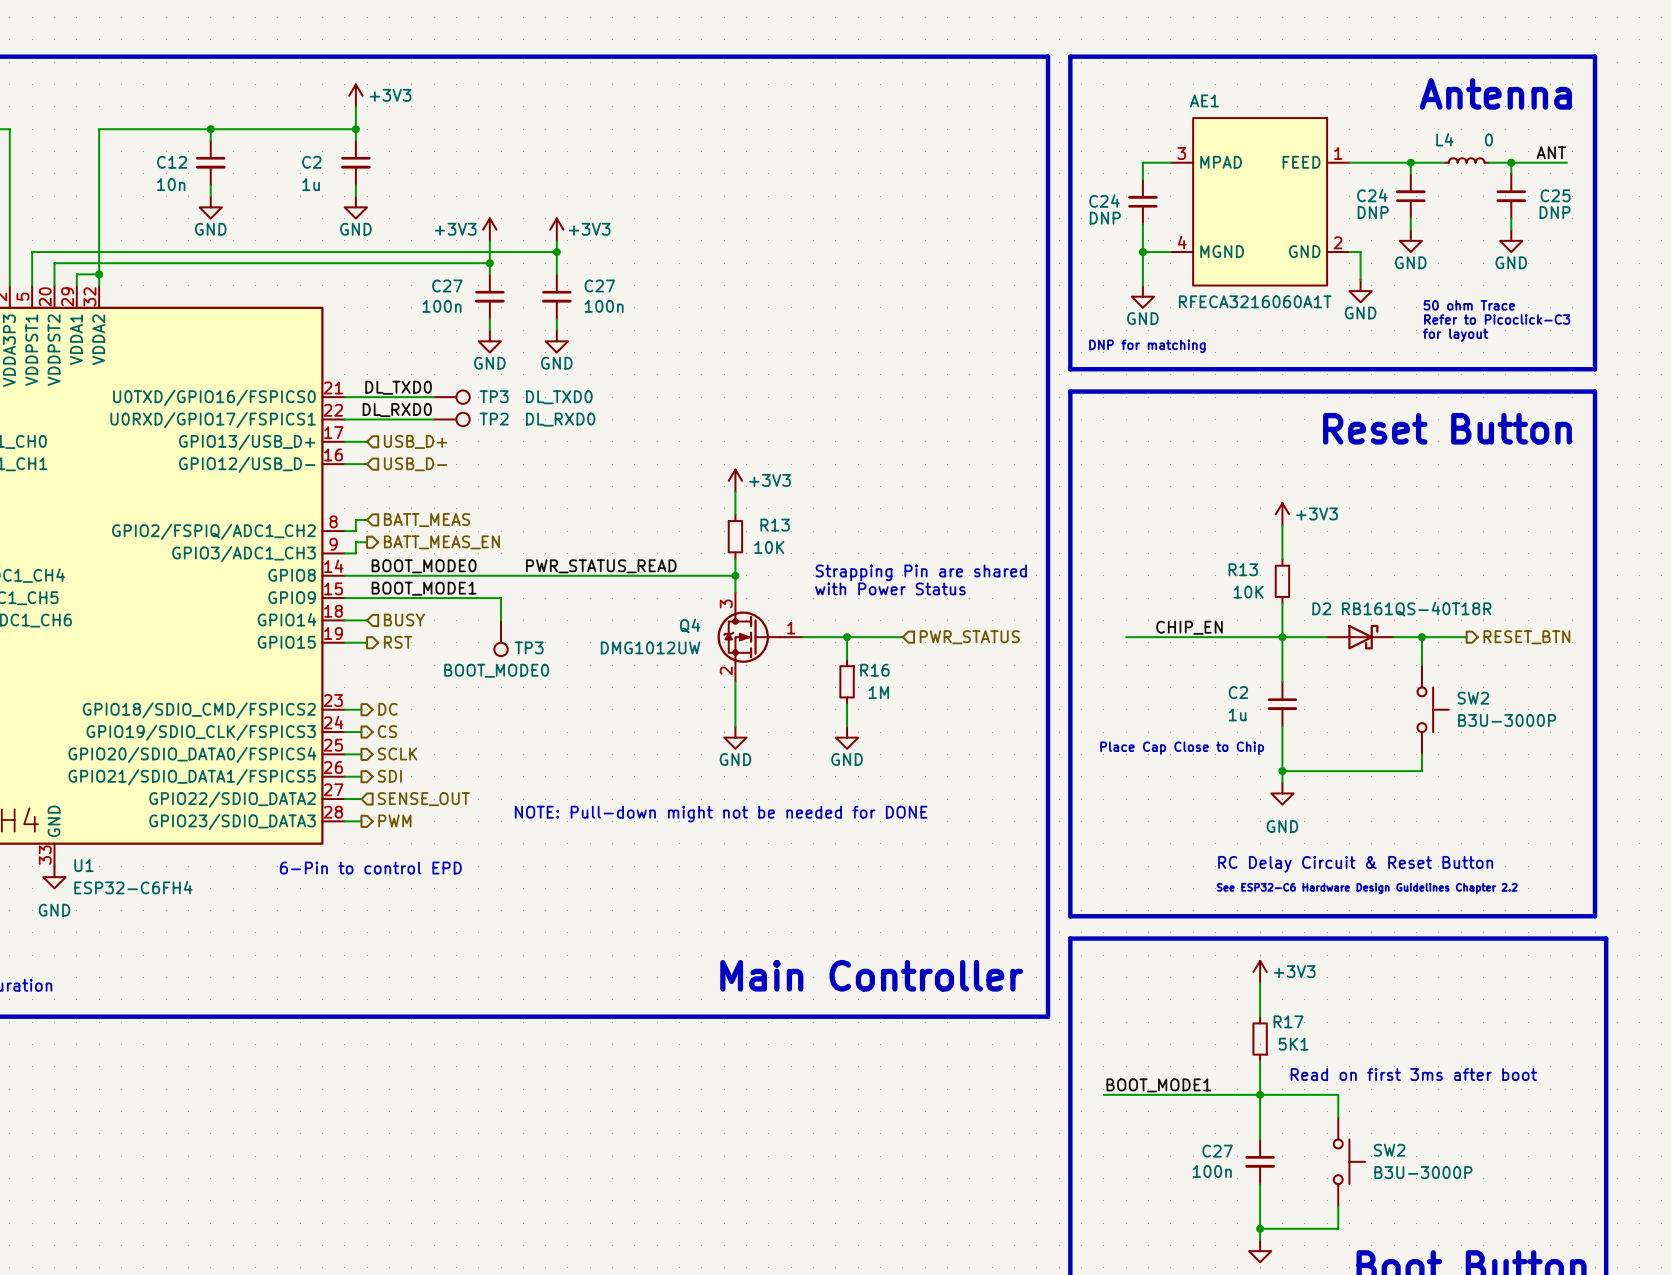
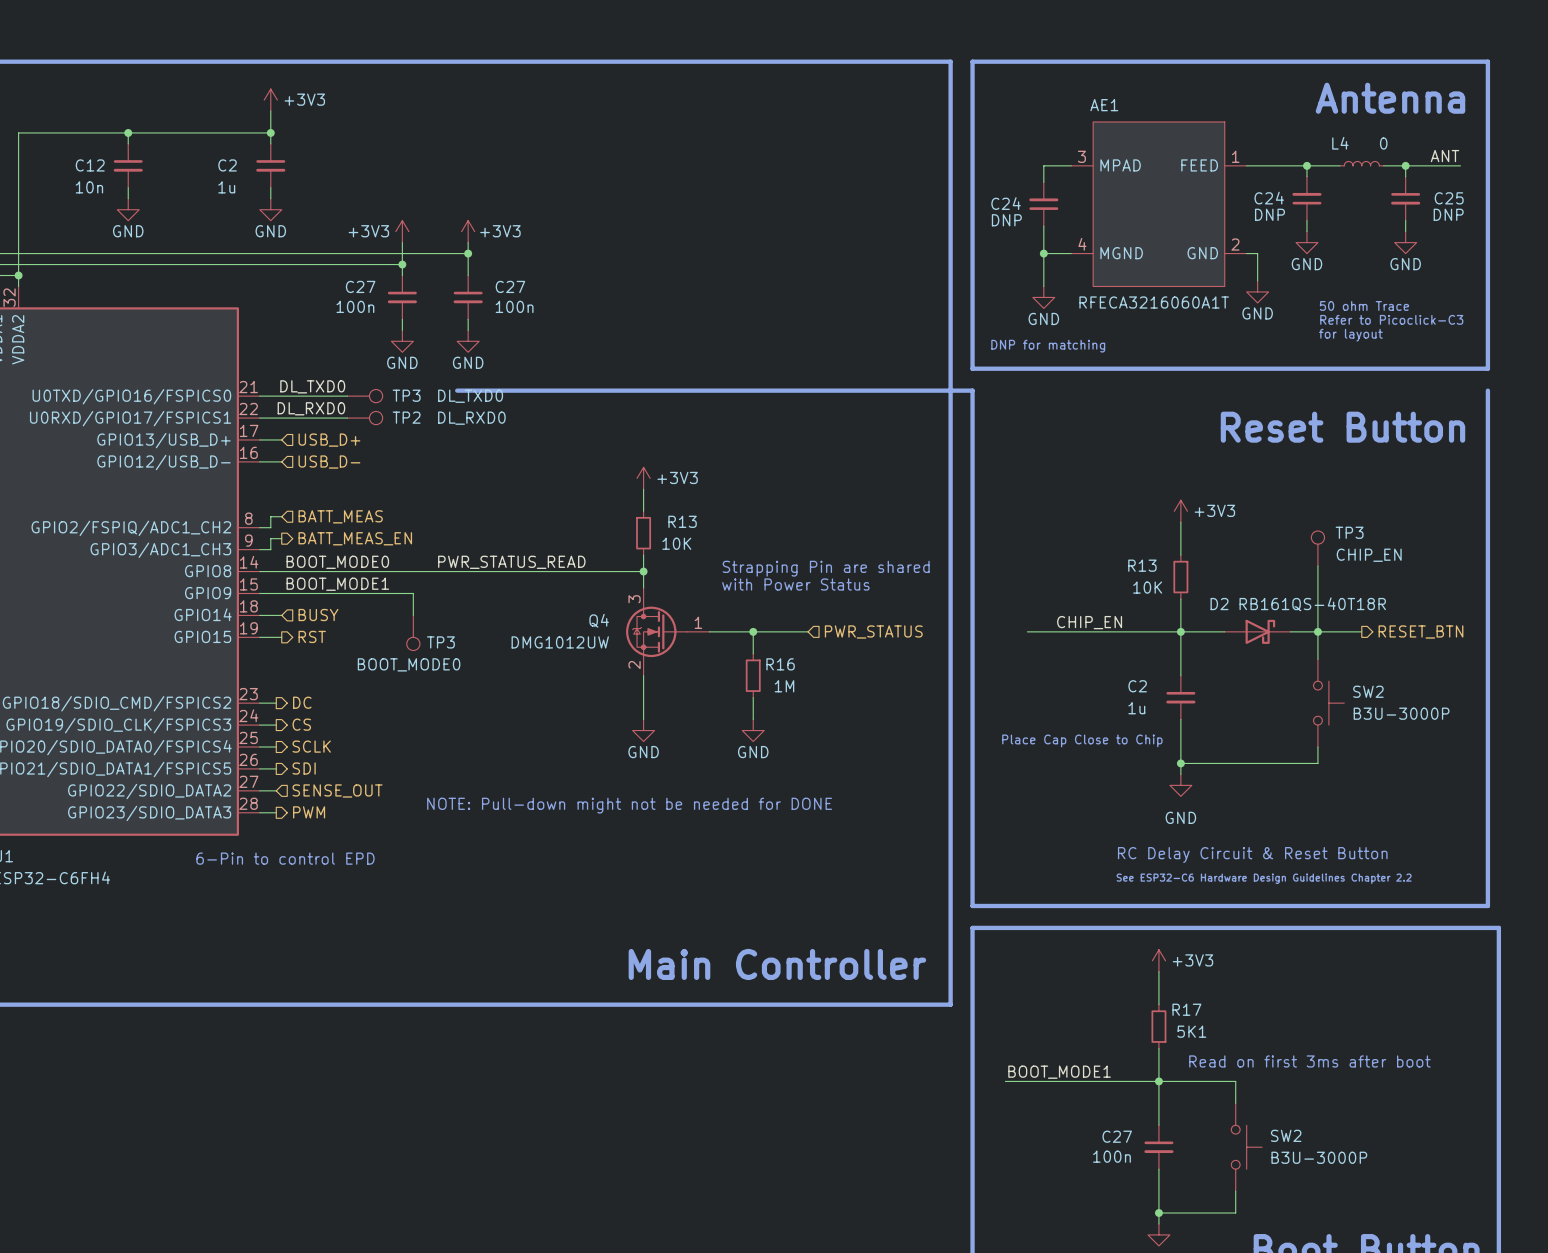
line: (1070, 391) (1595, 391) -> (972, 390) (457, 390)
TP3: none -> CHIP_EN (1317, 548)
wire: none -> (1317, 566) (1317, 631)

